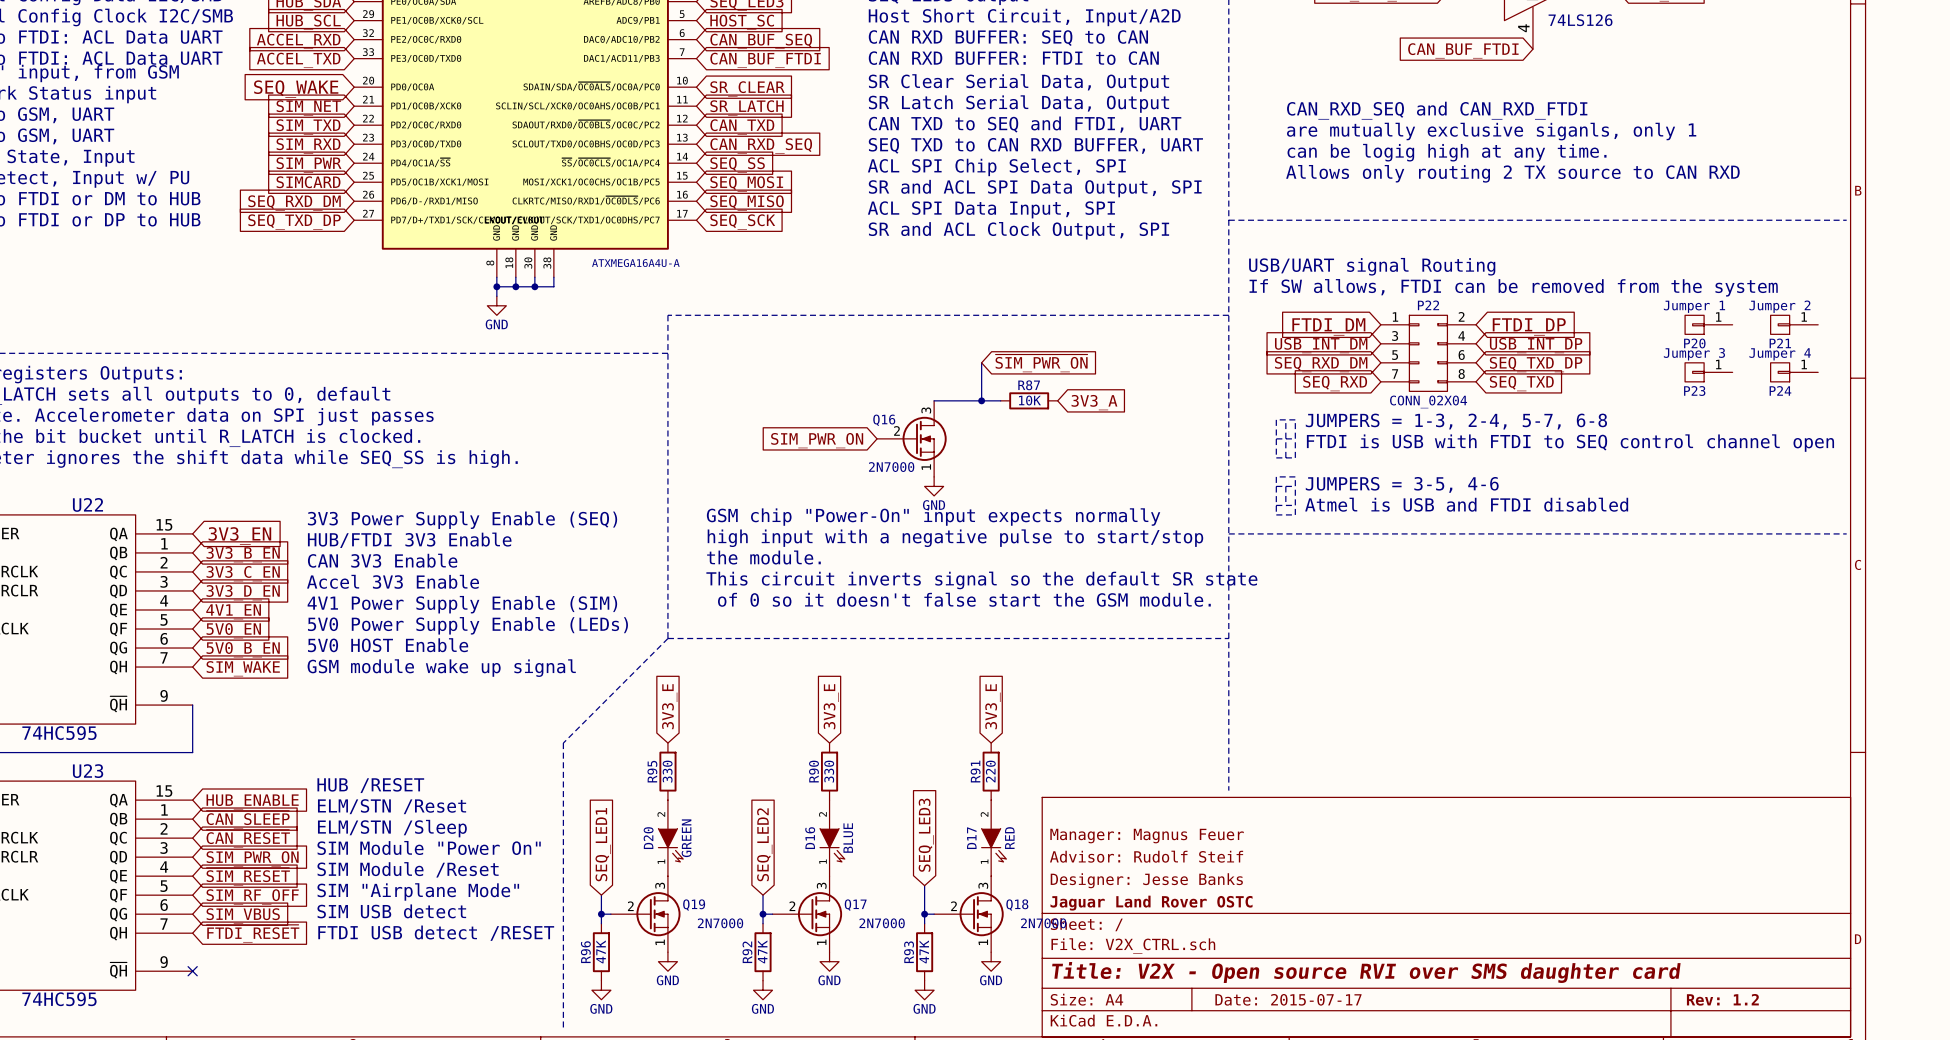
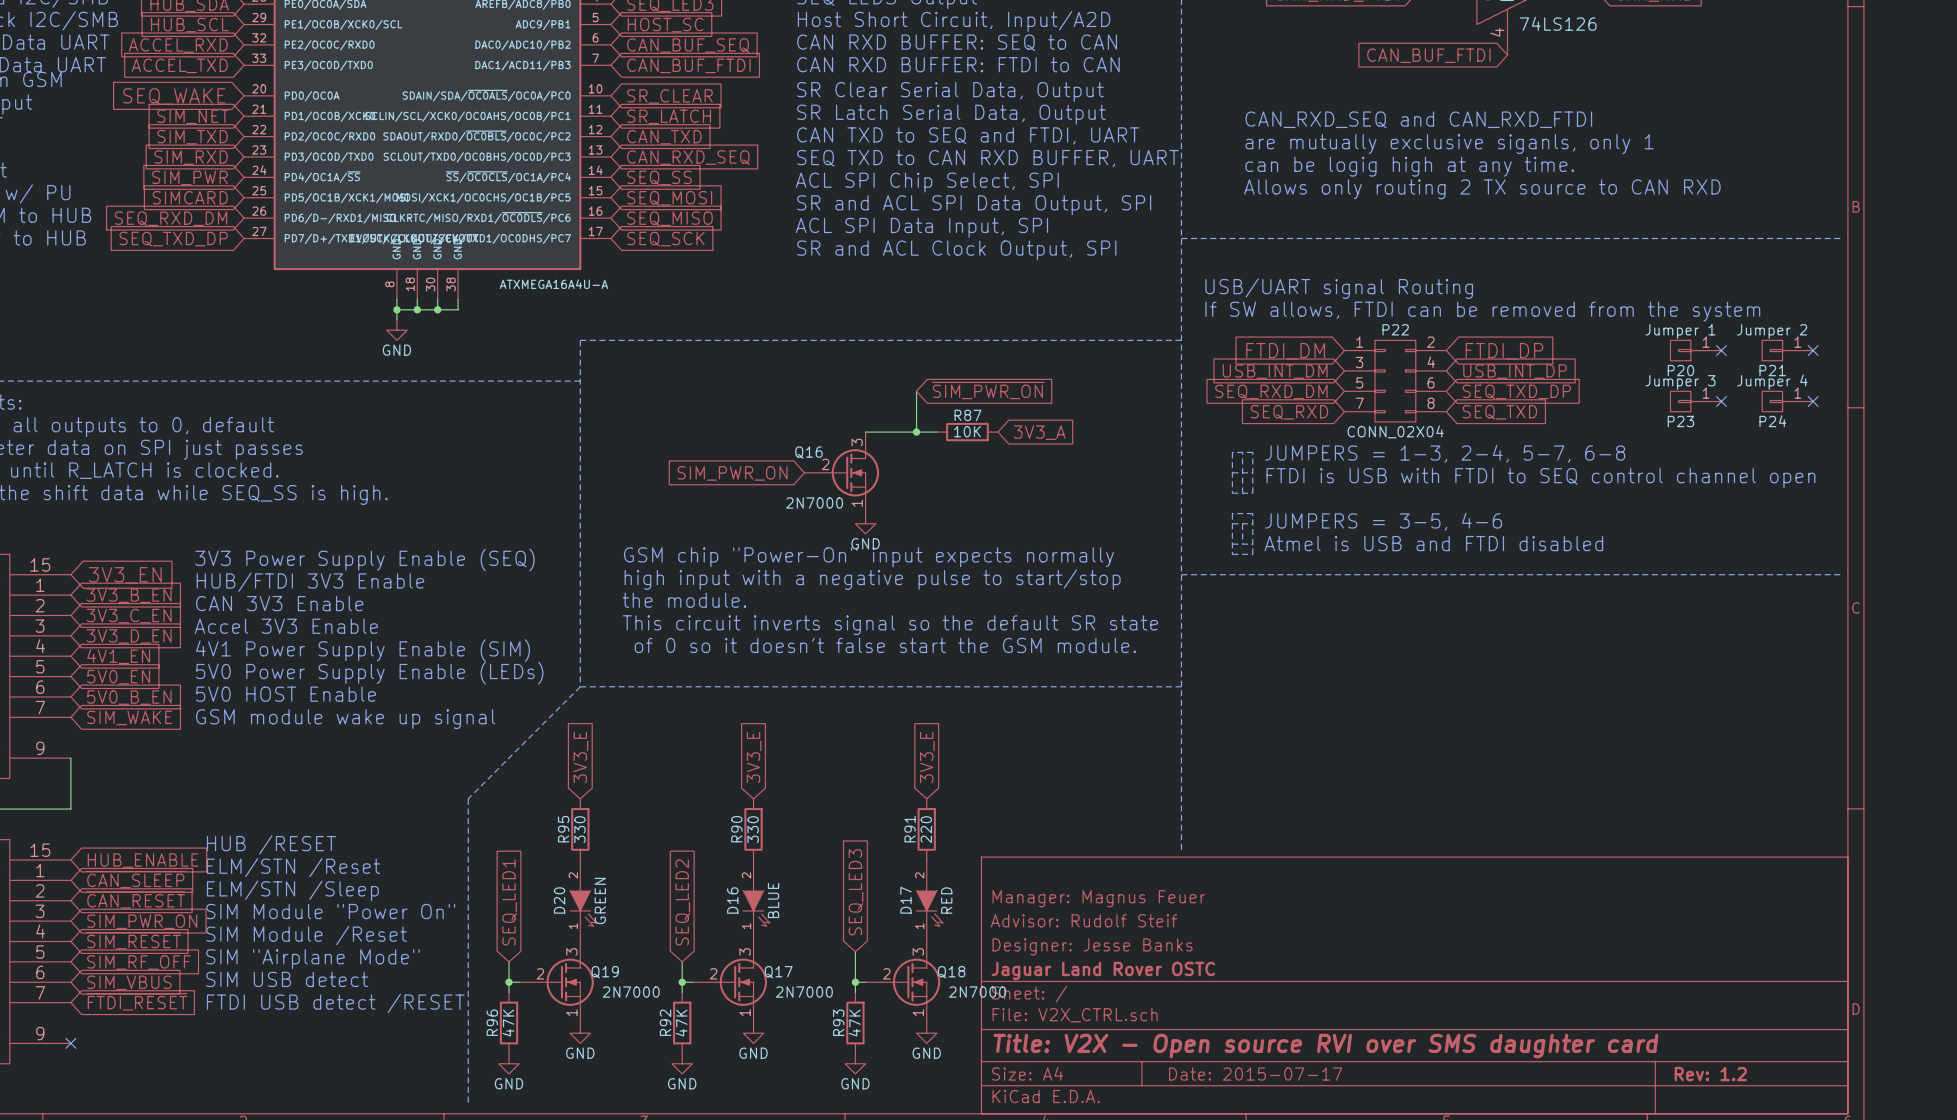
no-connect mark: none -> (1721, 350)
no-connect mark: none -> (1813, 350)
no-connect mark: none -> (1721, 401)
no-connect mark: none -> (1813, 401)

